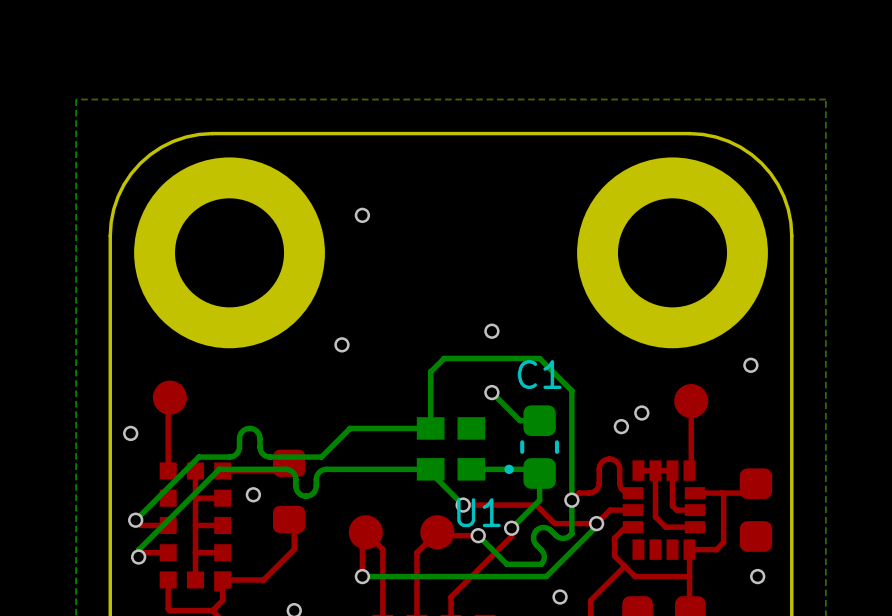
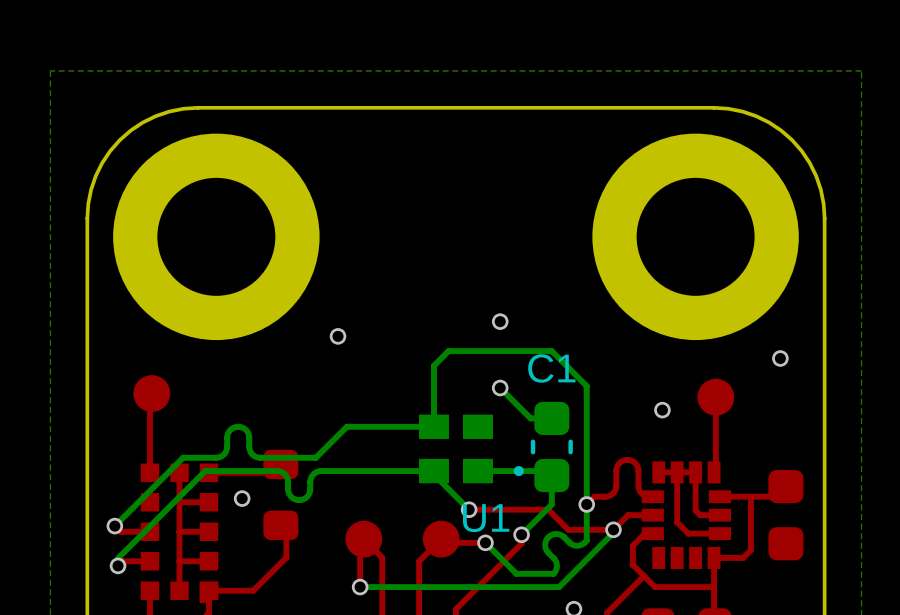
via: (362, 215) -> none
via: (621, 426) -> none
via: (130, 433) -> none
via: (757, 576) -> none

